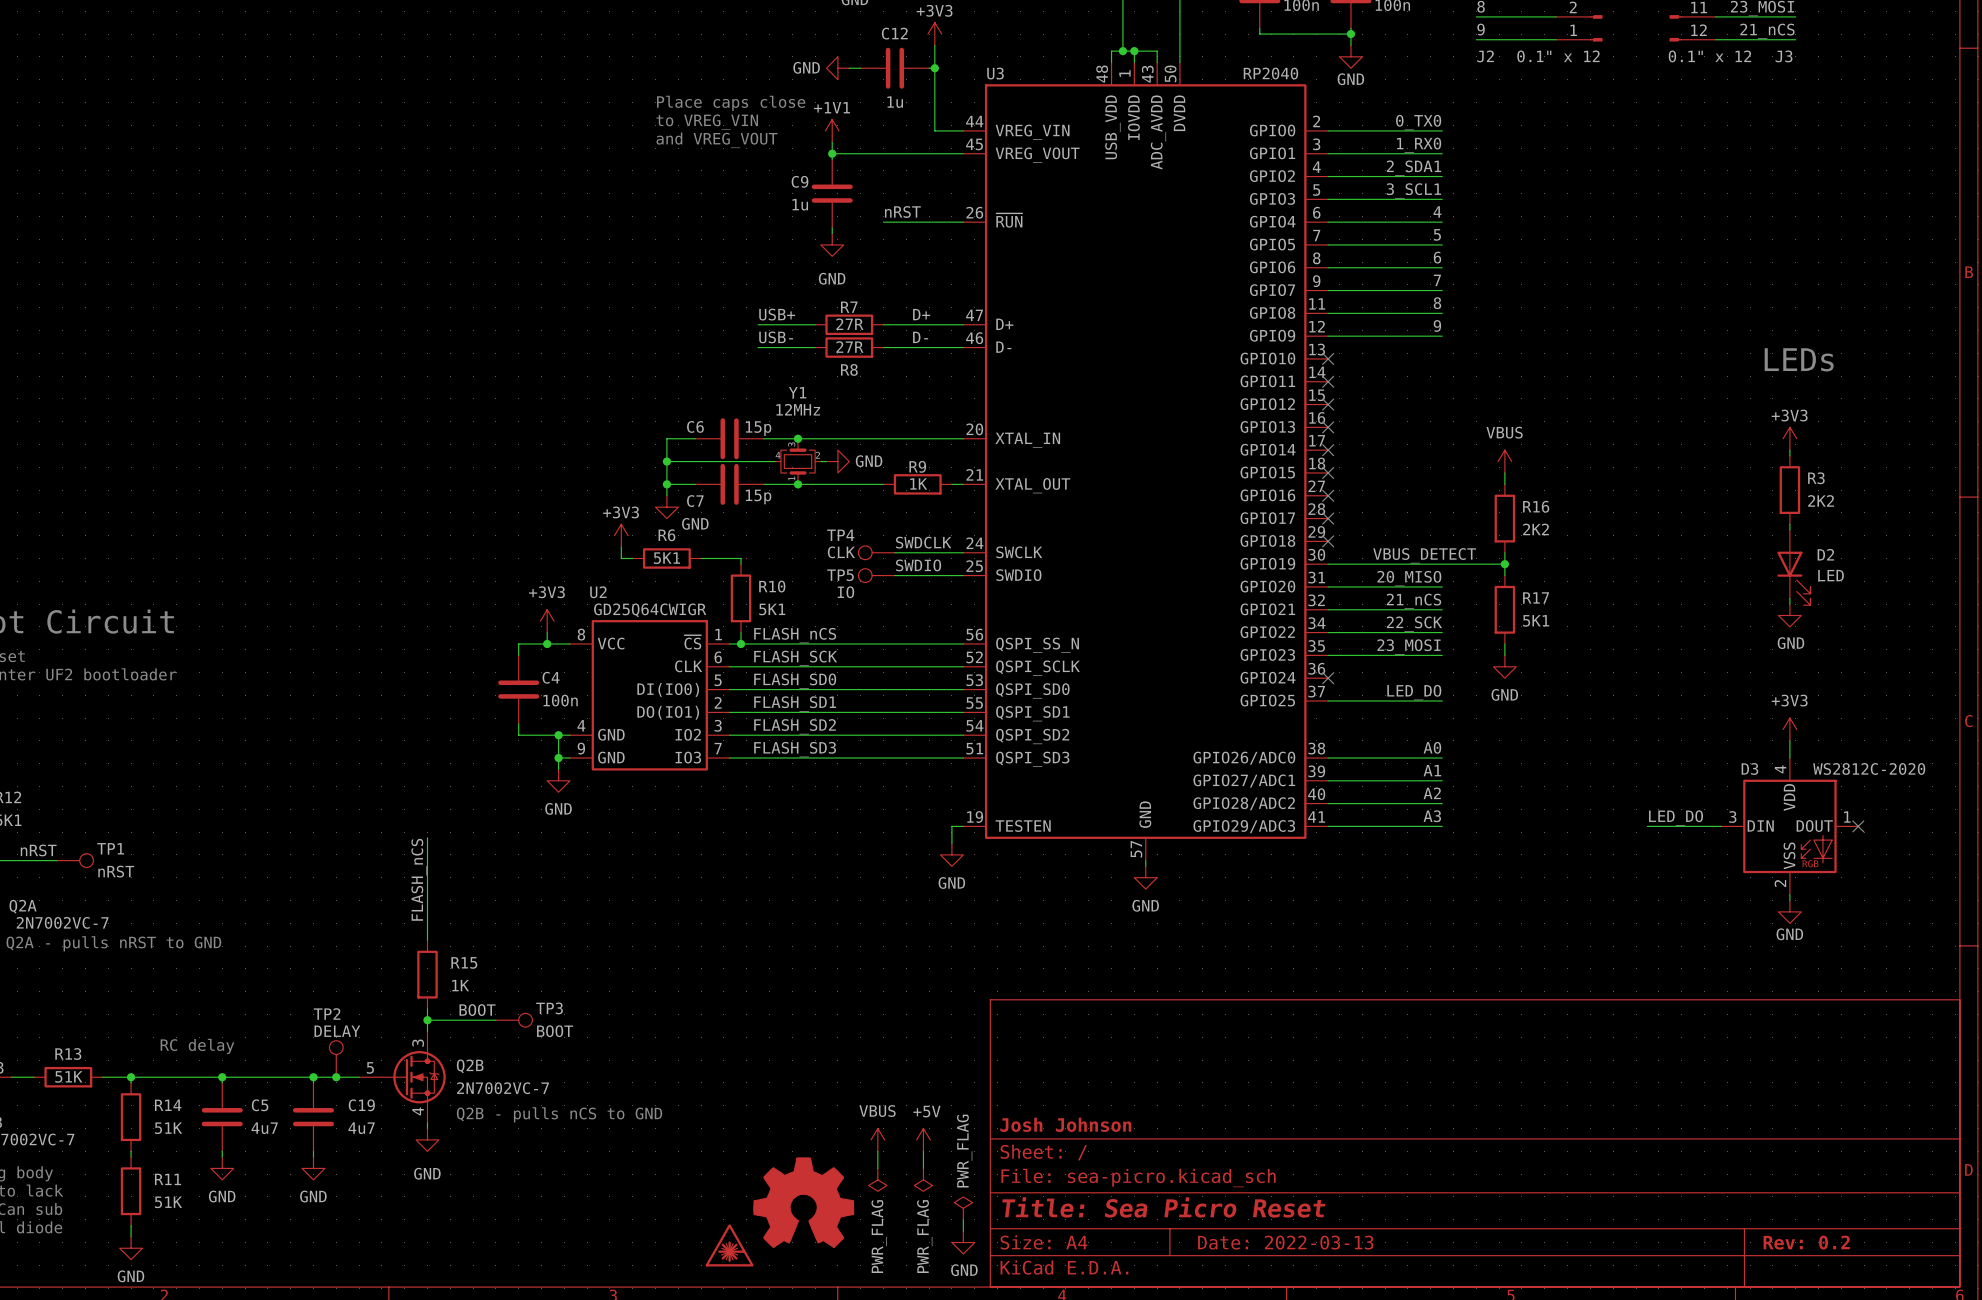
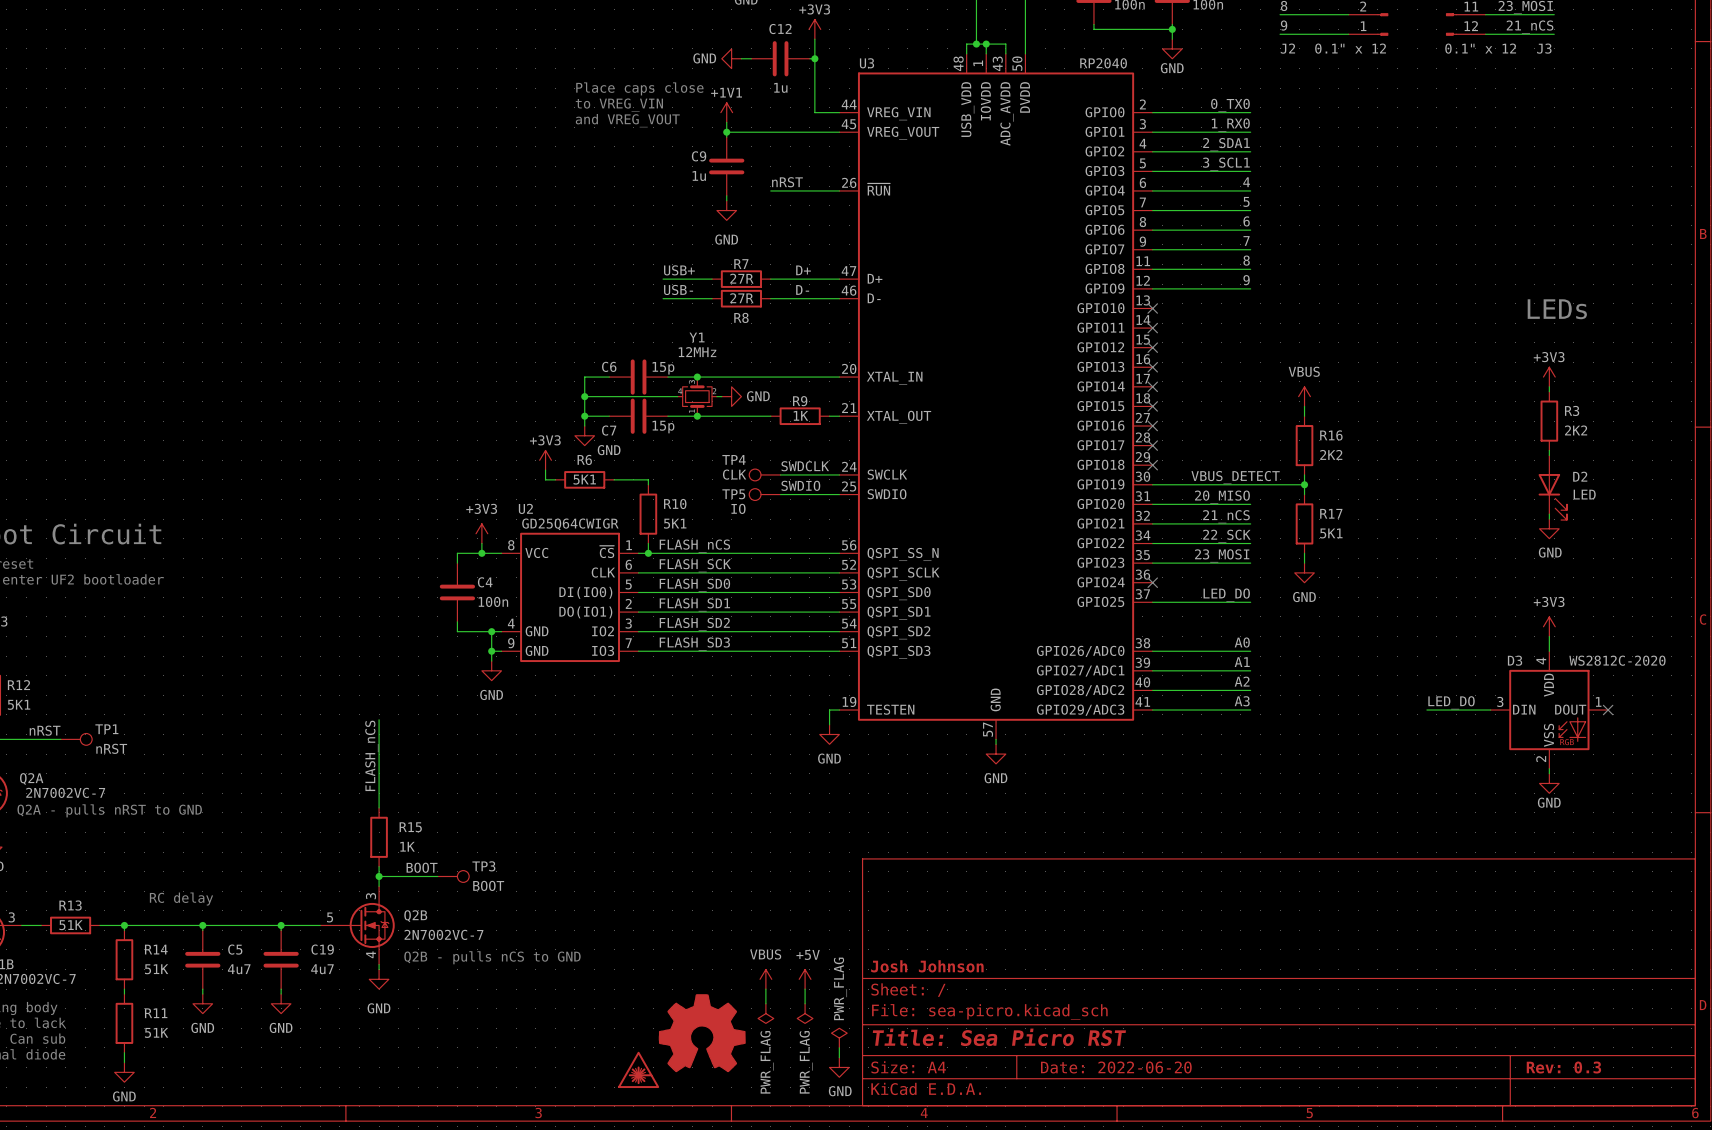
TP2: DELAY (336, 1058) -> none
junction: (336, 1077) -> none
title block: Title: Sea Picro Reset (1163, 1207) -> Title: Sea Picro RST (999, 1037)
title block: Date: 2022-03-13 (1285, 1242) -> Date: 2022-06-20 (1116, 1067)
title block: Rev: 0.2 (1806, 1242) -> Rev: 0.3 (1563, 1067)

